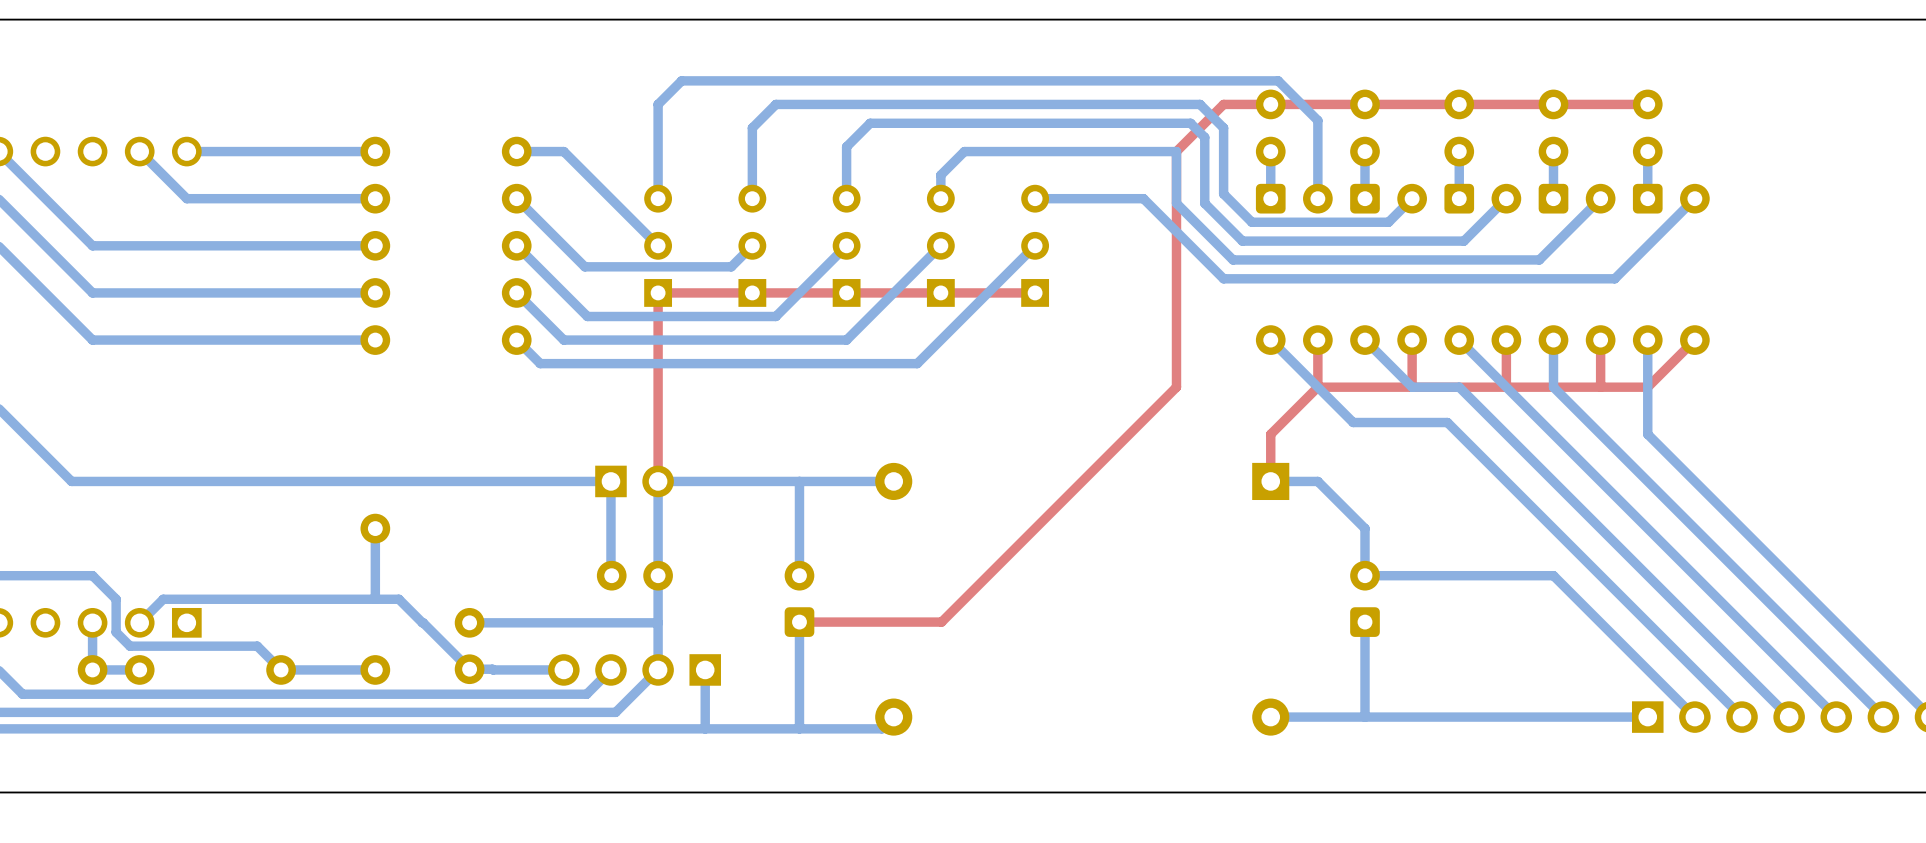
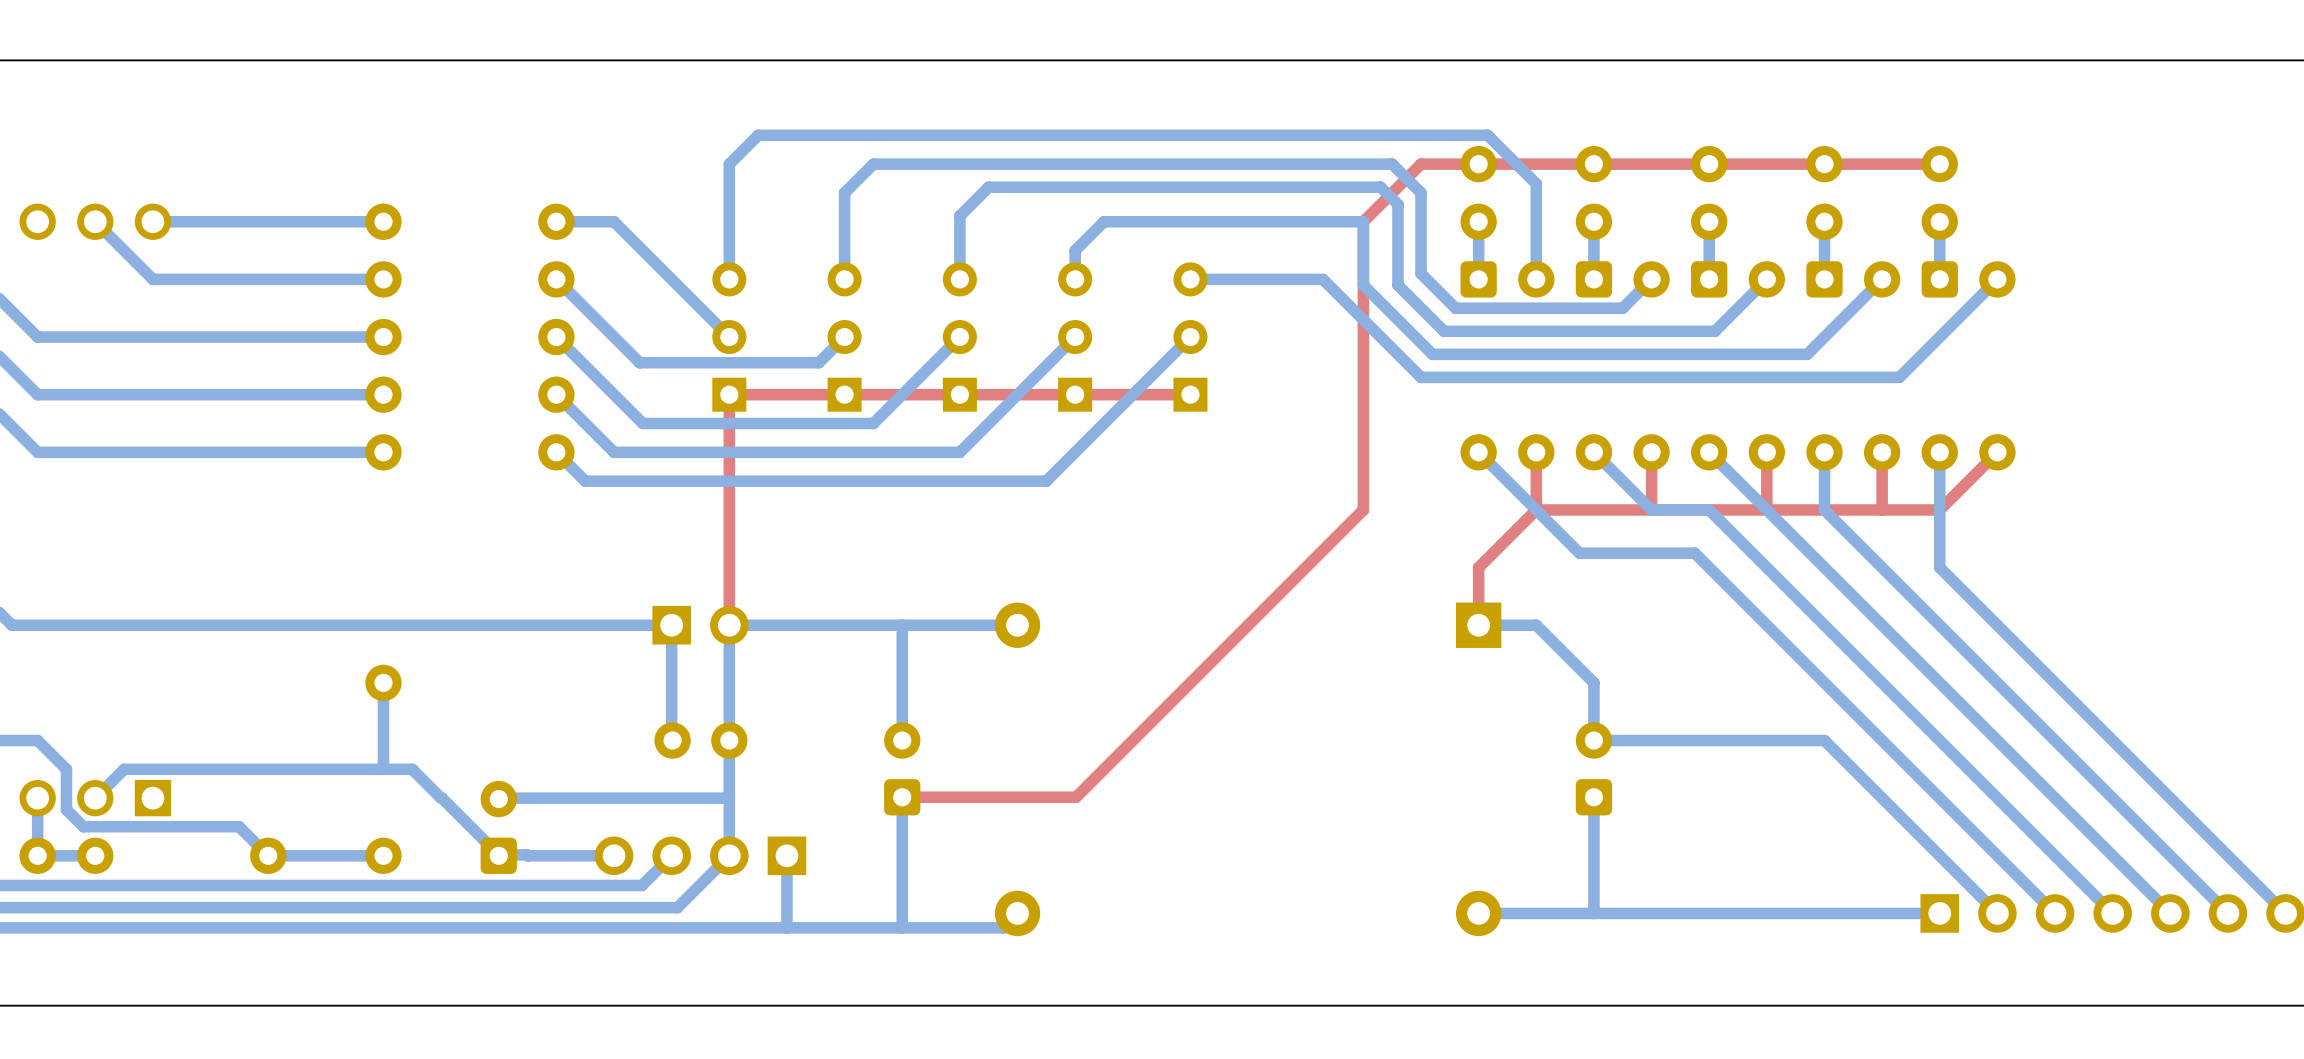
part footprint: [454, 607, 485, 685] -> [480, 780, 517, 874]

